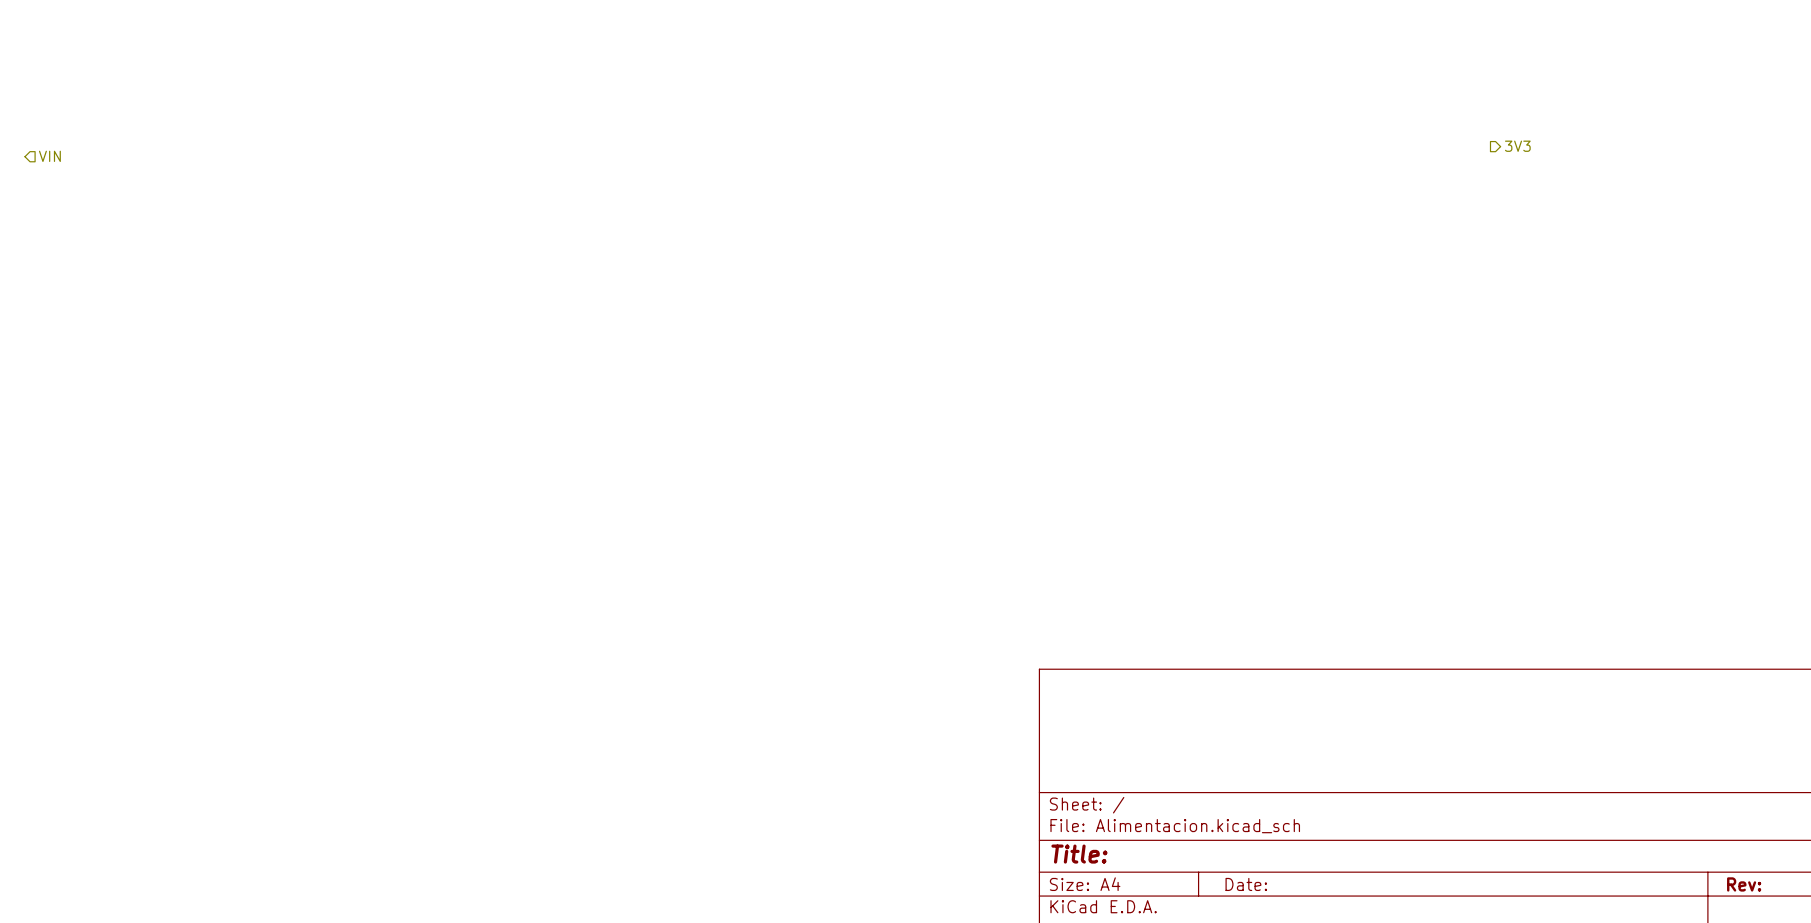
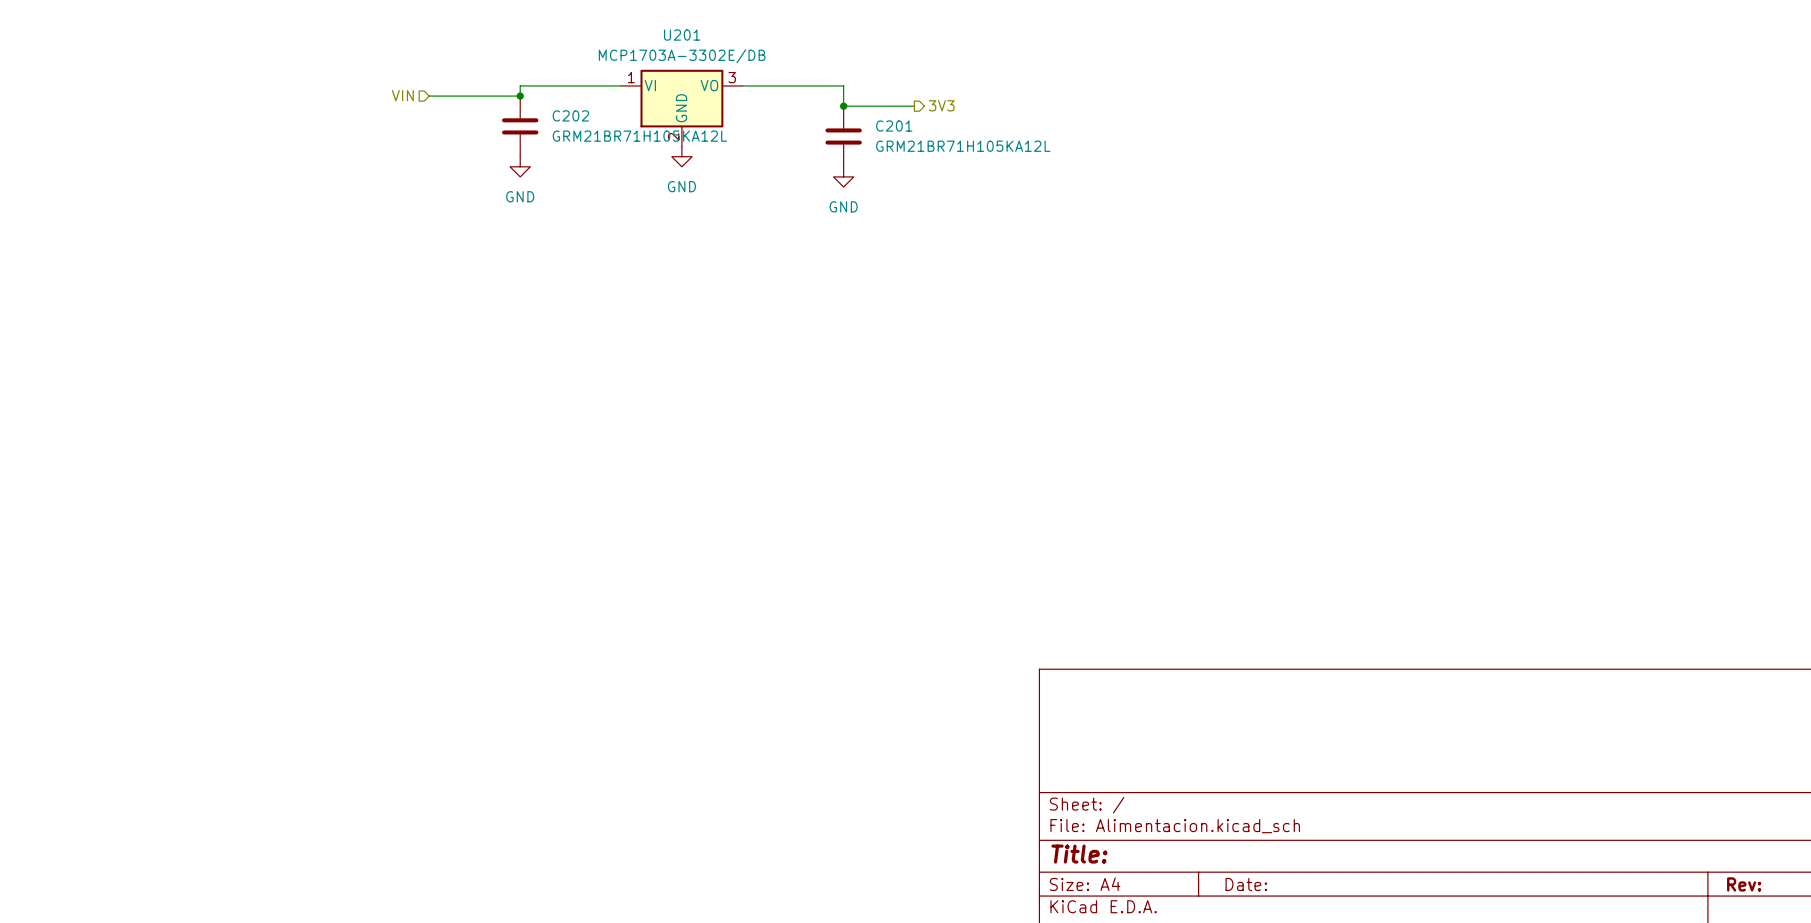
wire: none -> (621, 85) (520, 85) (520, 96) (429, 96)
wire: none -> (742, 85) (843, 85) (843, 106) (914, 106)
hierarchical label: none -> VIN (402, 95)
junction: none -> (520, 96)
hierarchical label: none -> 3V3 (941, 105)
junction: none -> (843, 106)
U201: none -> MCP1703A-3302E/DB (681, 108)
C202: none -> GRM21BR71H105KA12L (520, 126)
C201: none -> GRM21BR71H105KA12L (843, 136)
hierarchical label: 3V3 (1517, 146) -> none
hierarchical label: VIN (49, 156) -> none
power symbol: none -> GND (681, 156)
power symbol: none -> GND (520, 166)
power symbol: none -> GND (843, 176)

